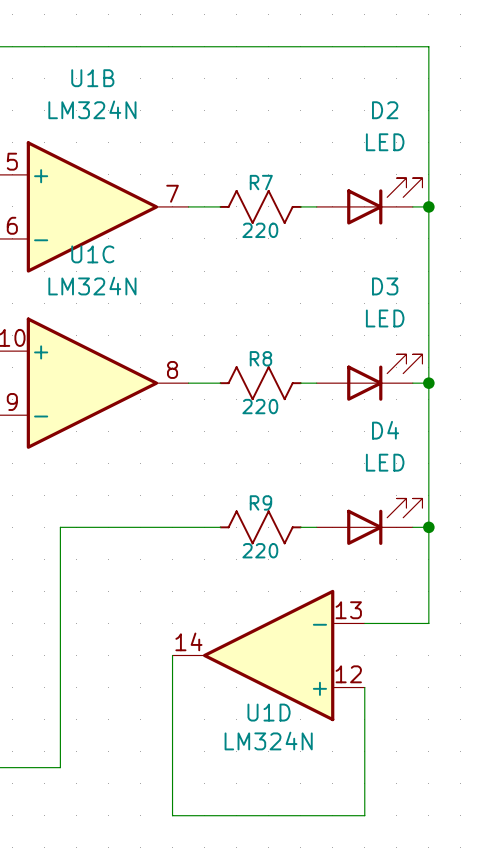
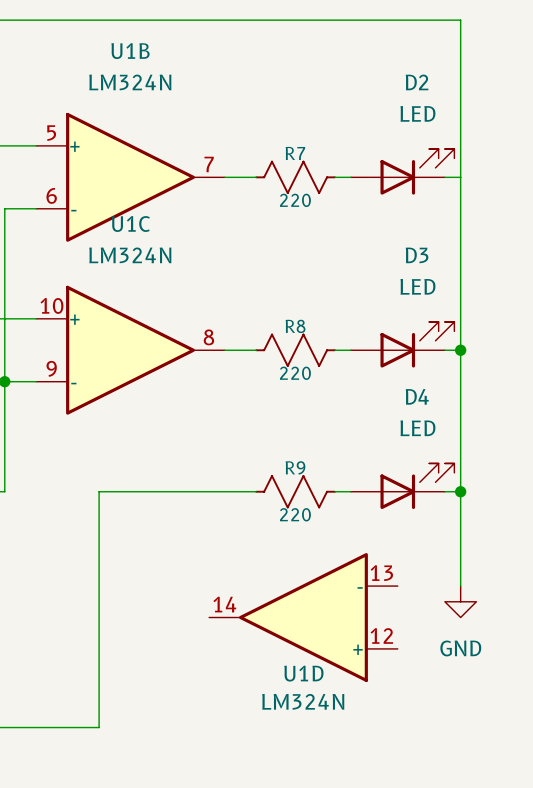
junction: (428, 206) -> none
wire: (364, 623) (428, 623) -> none
power symbol: none -> GND (460, 601)
wire: (172, 655) (172, 815) (364, 815) (364, 687) -> none

